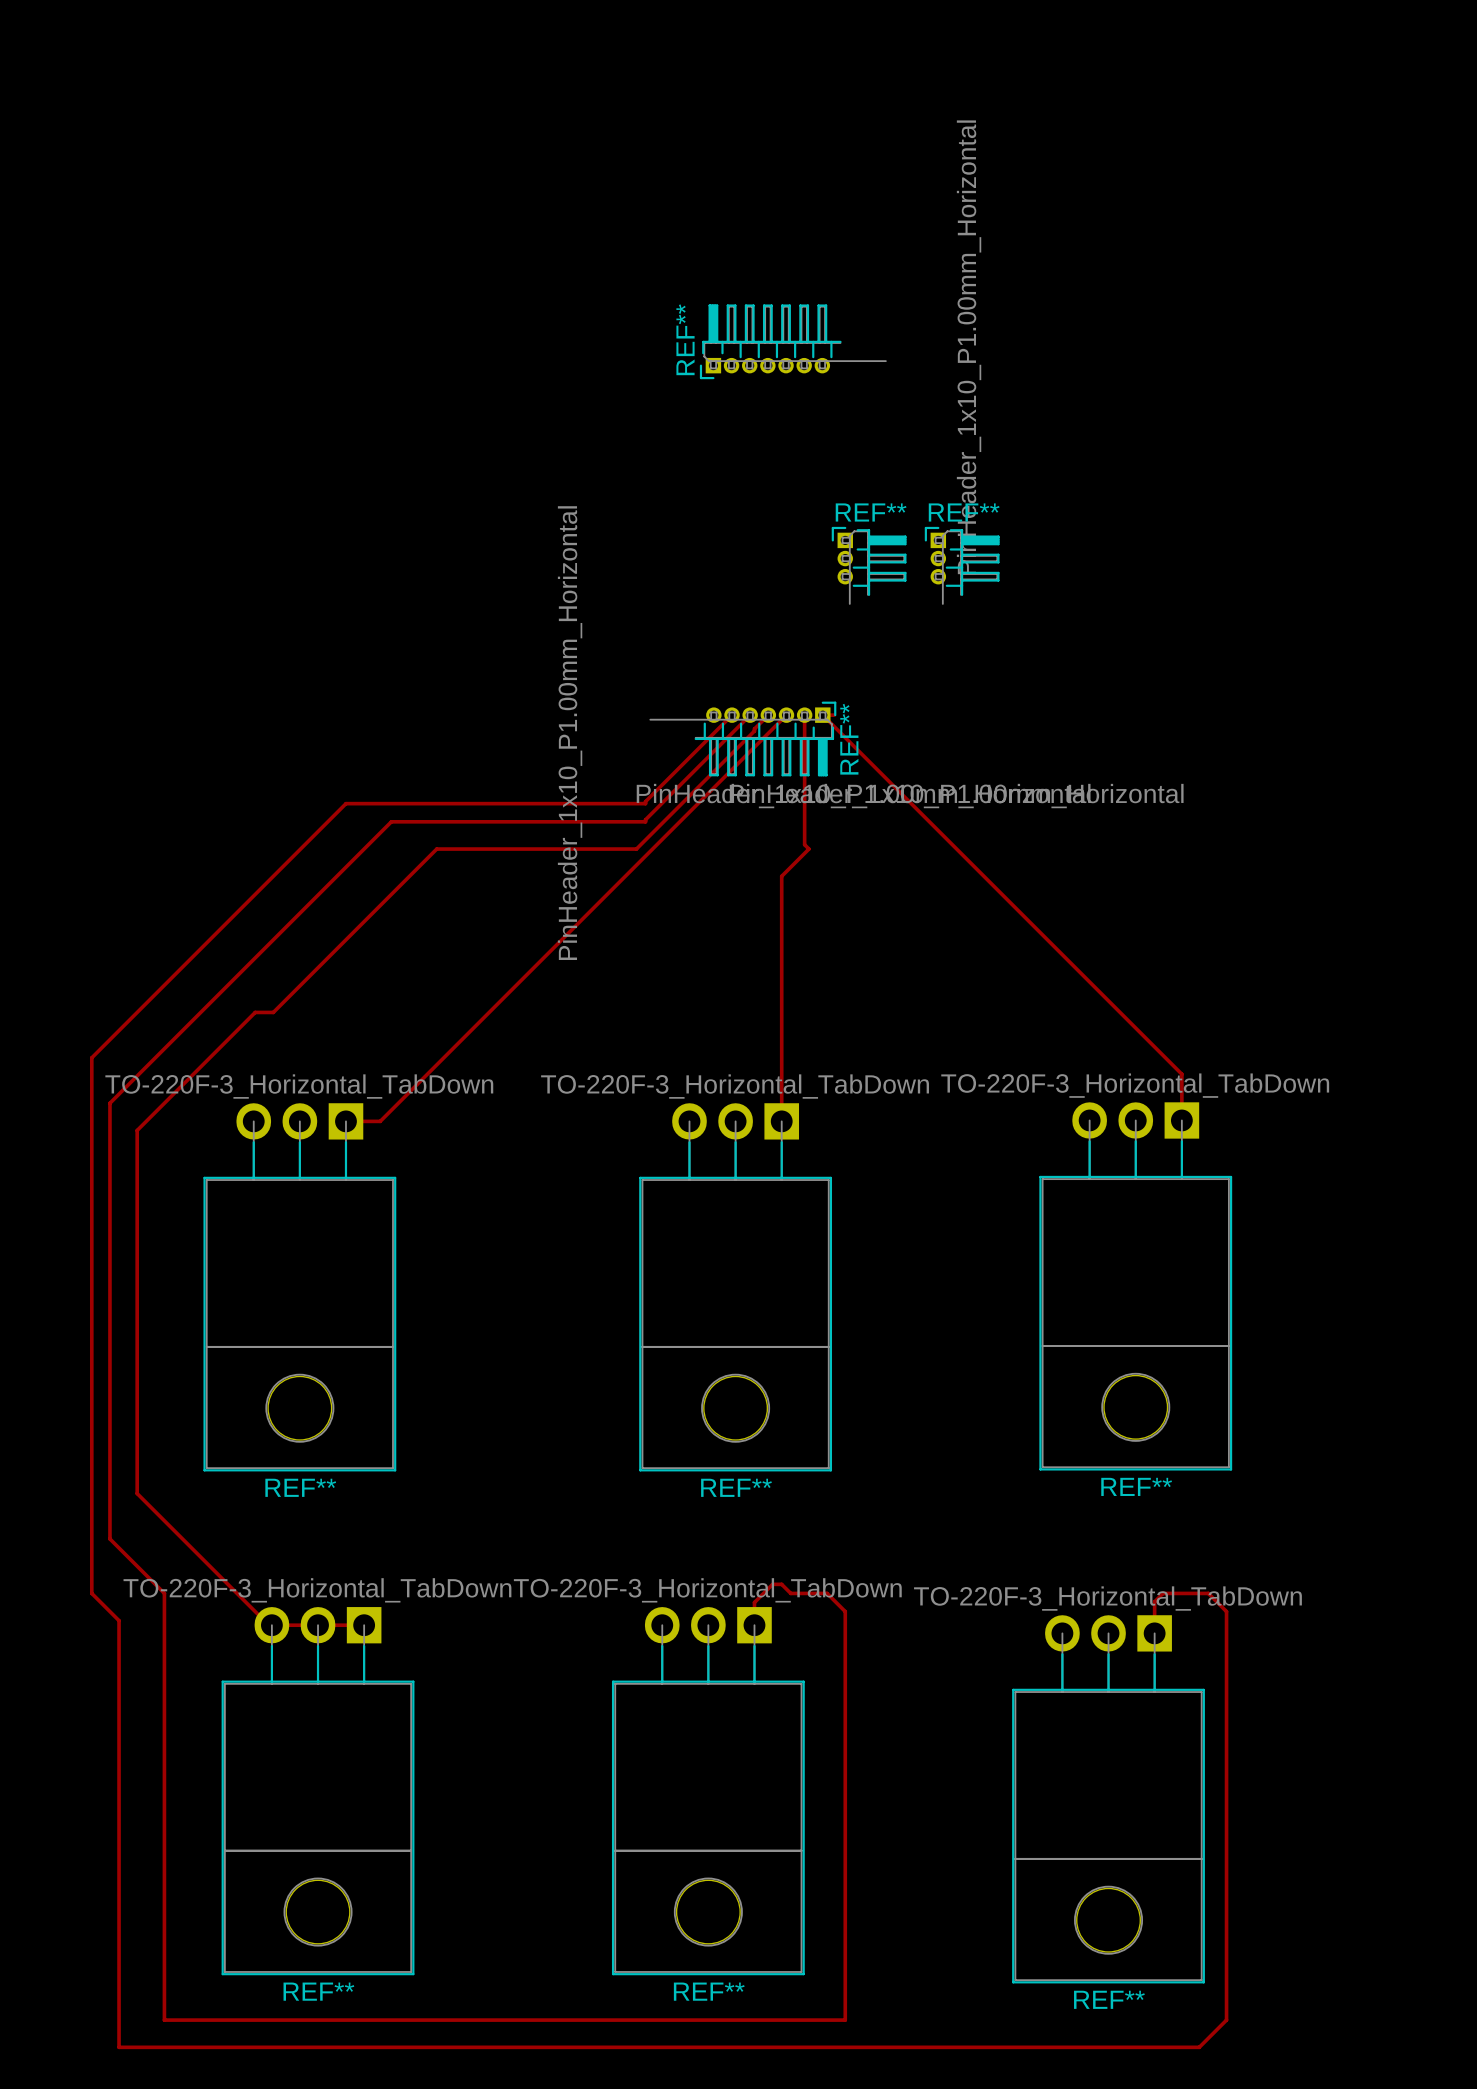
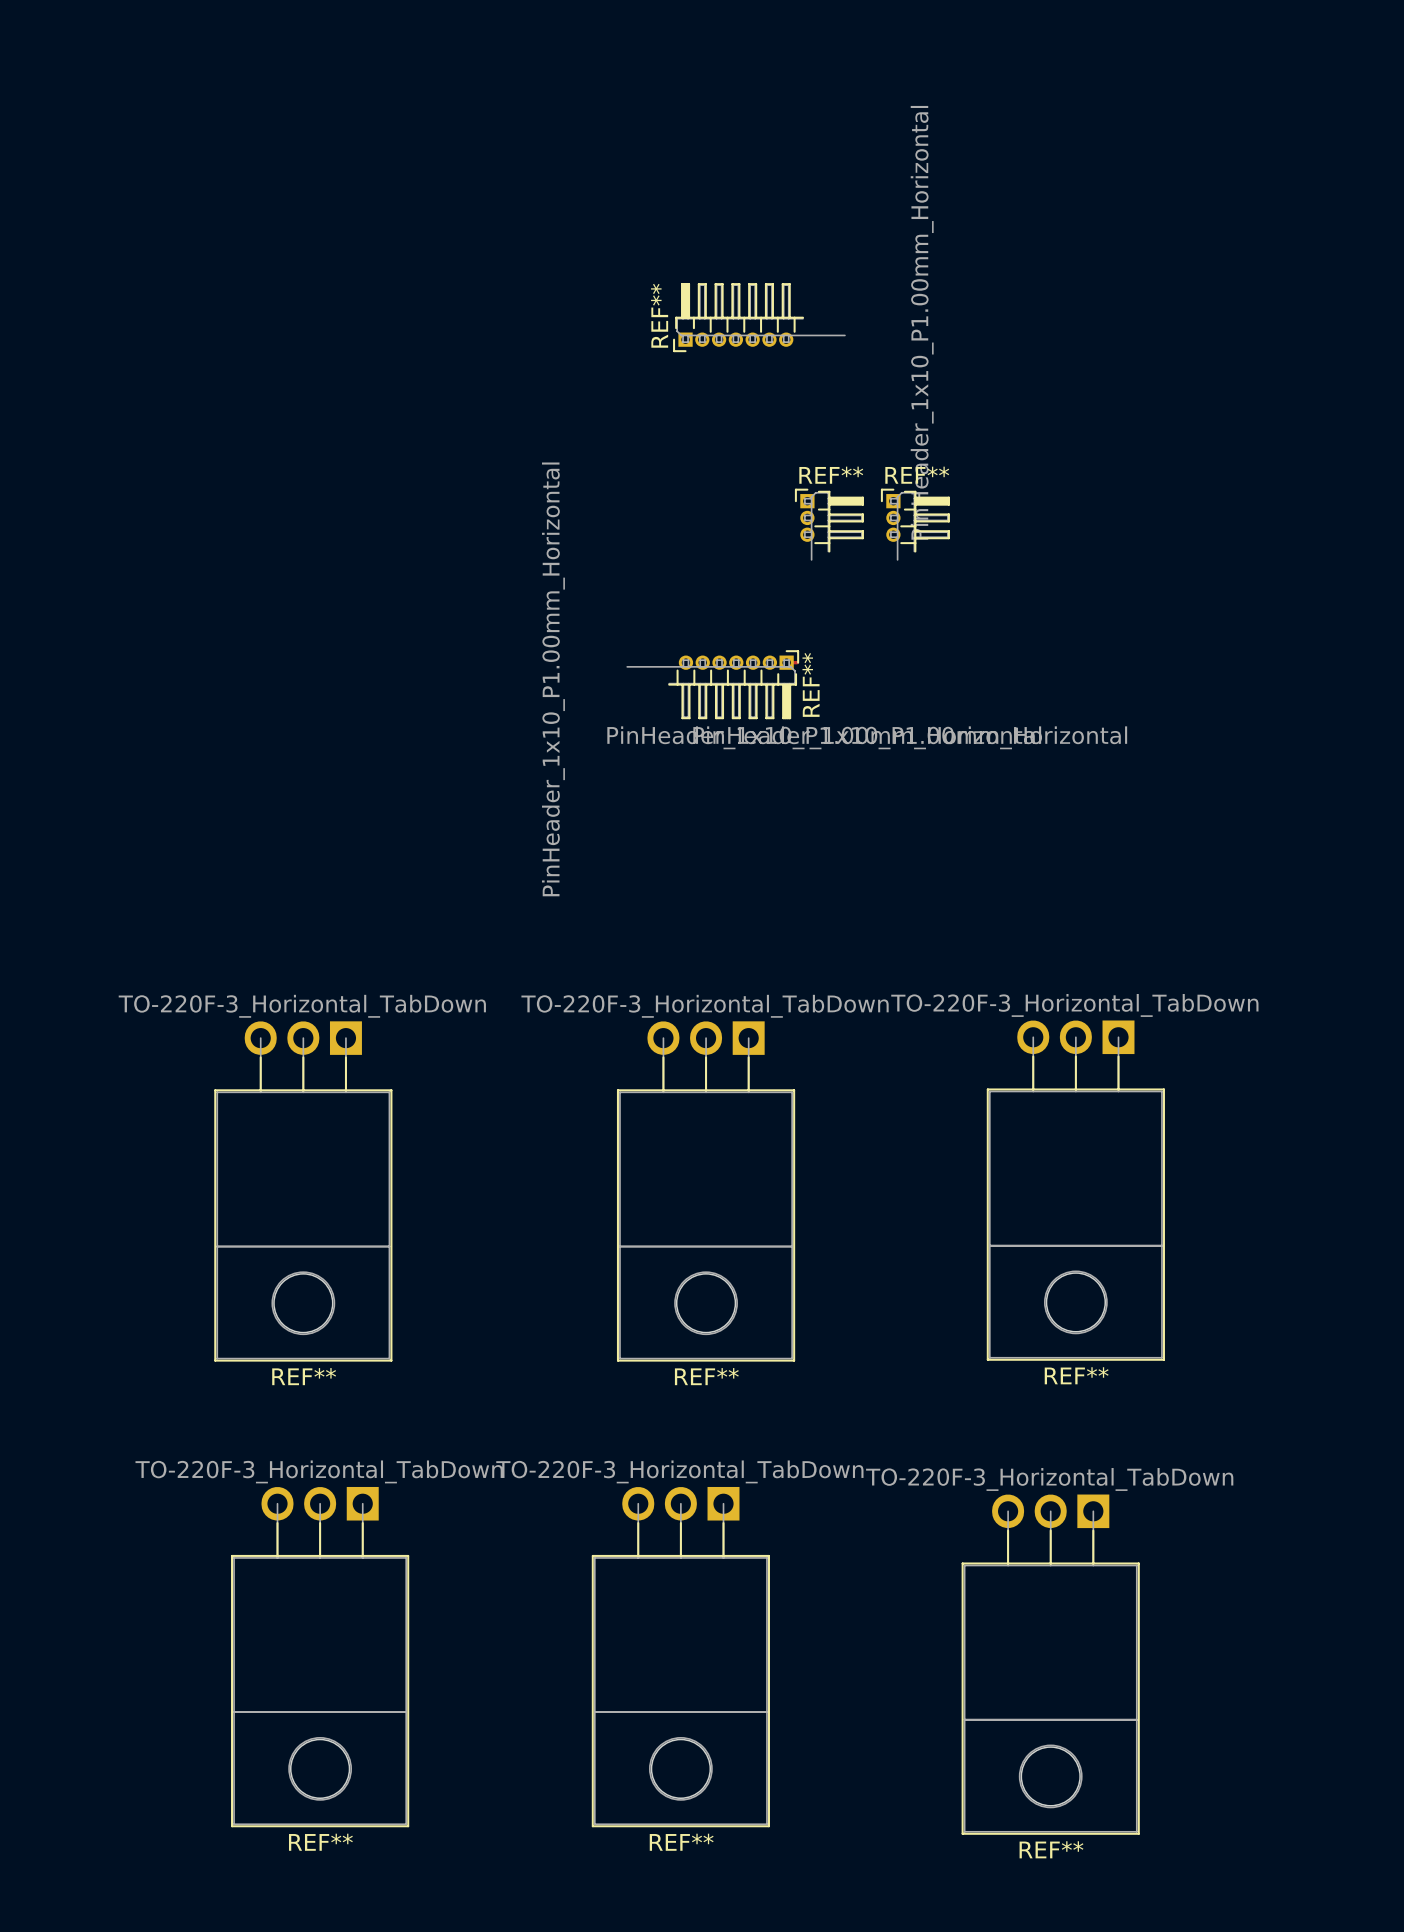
top track: (732, 715) (645, 803) (345, 803) (91, 1057) (91, 1593) (119, 1620) (119, 2047) (1199, 2047) (1226, 2020) (1226, 1611) (1208, 1593) (1162, 1593) (1154, 1601) (1154, 1633) -> none
top track: (750, 715) (645, 821) (391, 821) (109, 1103) (109, 1538) (164, 1593) (164, 2020) (845, 2020) (845, 1611) (827, 1593) (790, 1593) (781, 1584) (772, 1584) (754, 1602) (754, 1625) -> none
top track: (768, 715) (636, 849) (436, 849) (273, 1012) (255, 1012) (137, 1130) (137, 1493) (268, 1625) (364, 1625) -> none
top track: (786, 715) (380, 1121) (345, 1121) -> none
top track: (804, 715) (804, 844) (808, 849) (781, 876) (781, 1121) -> none
top track: (822, 715) (1181, 1074) (1181, 1120) -> none

